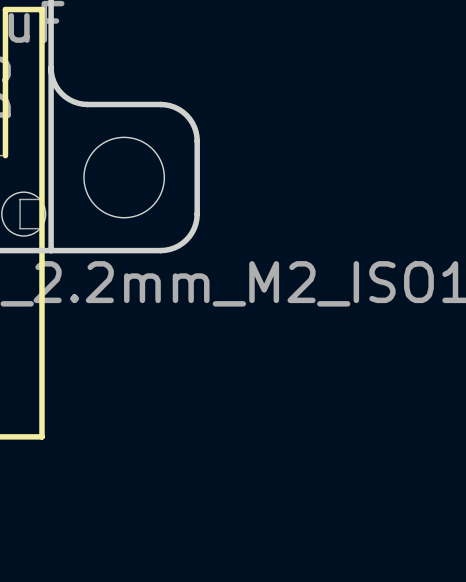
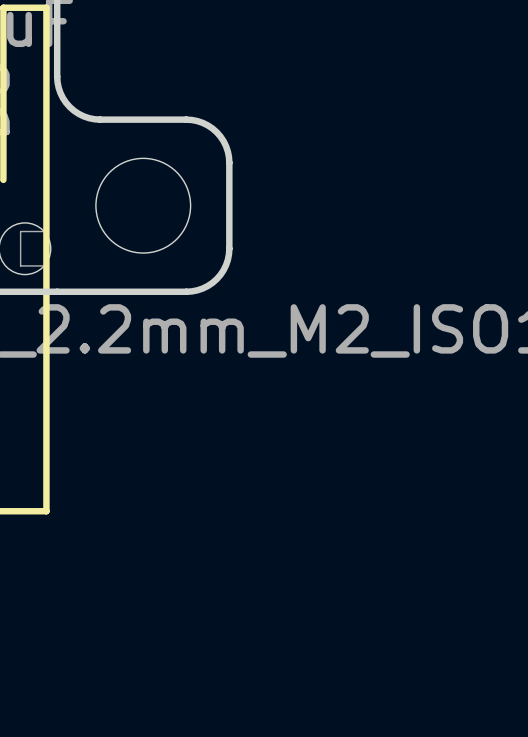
board edge: (51, 67) (51, 250) -> none

